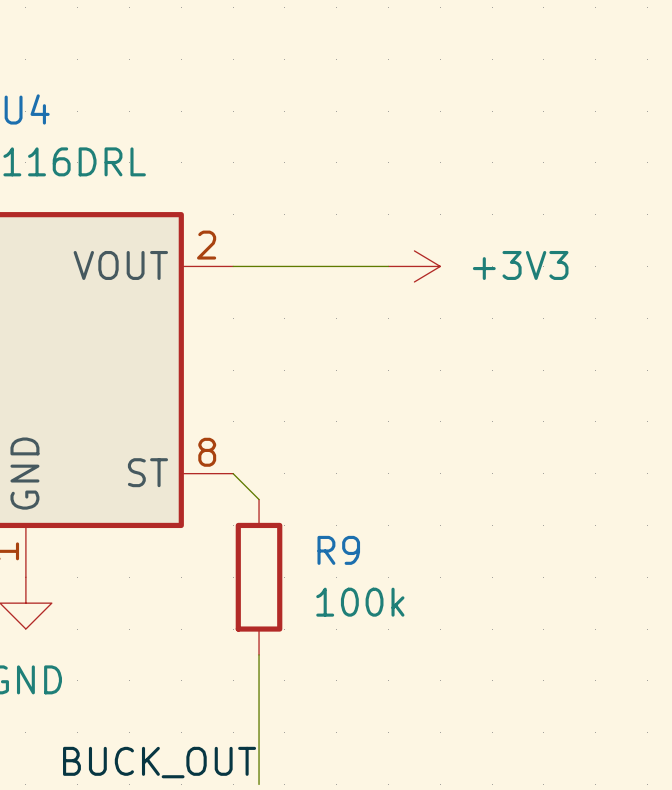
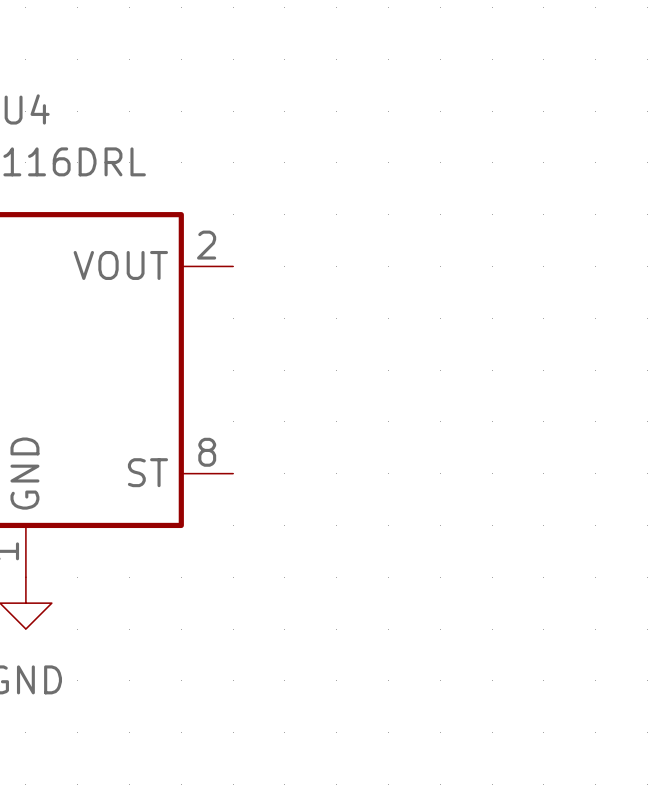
wire: (233, 266) (388, 266) -> none
power symbol: +3V3 (414, 266) -> none
wire: (233, 473) (259, 499) -> none
R9: 100k (259, 577) -> none
wire: (259, 654) (259, 784) -> none
label: BUCK_OUT (159, 762) -> none

